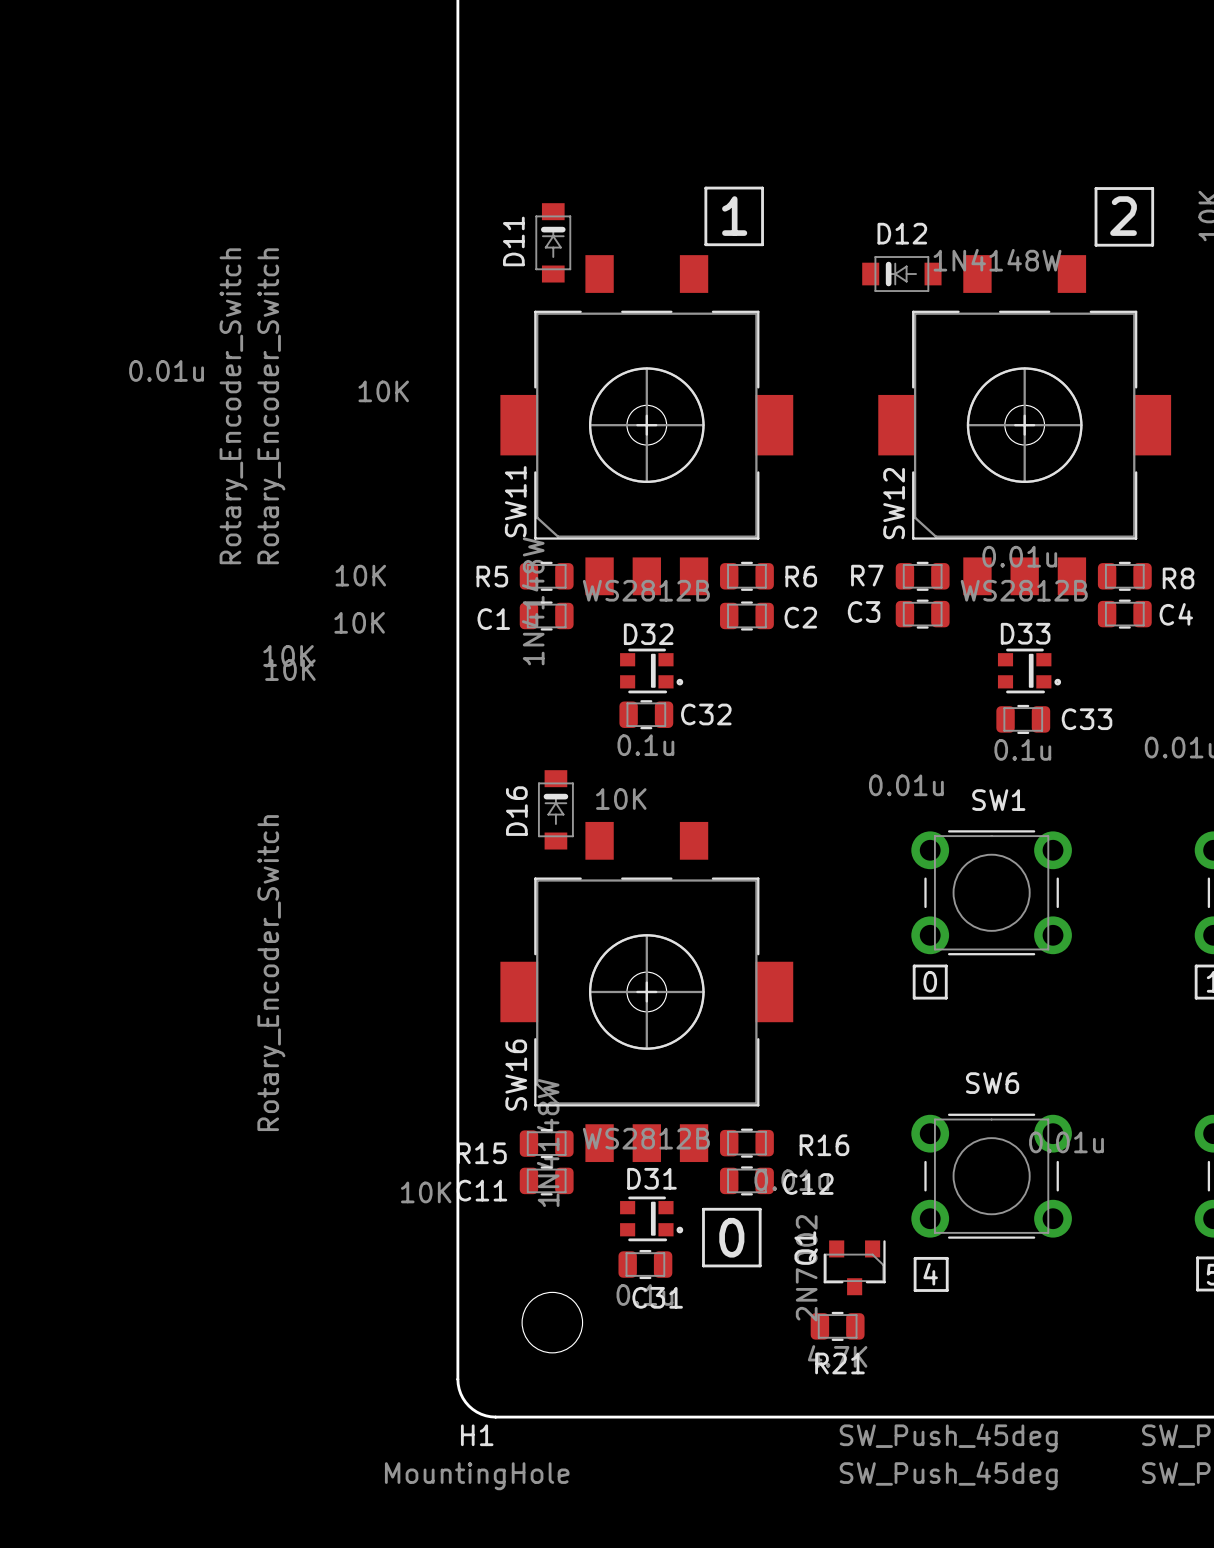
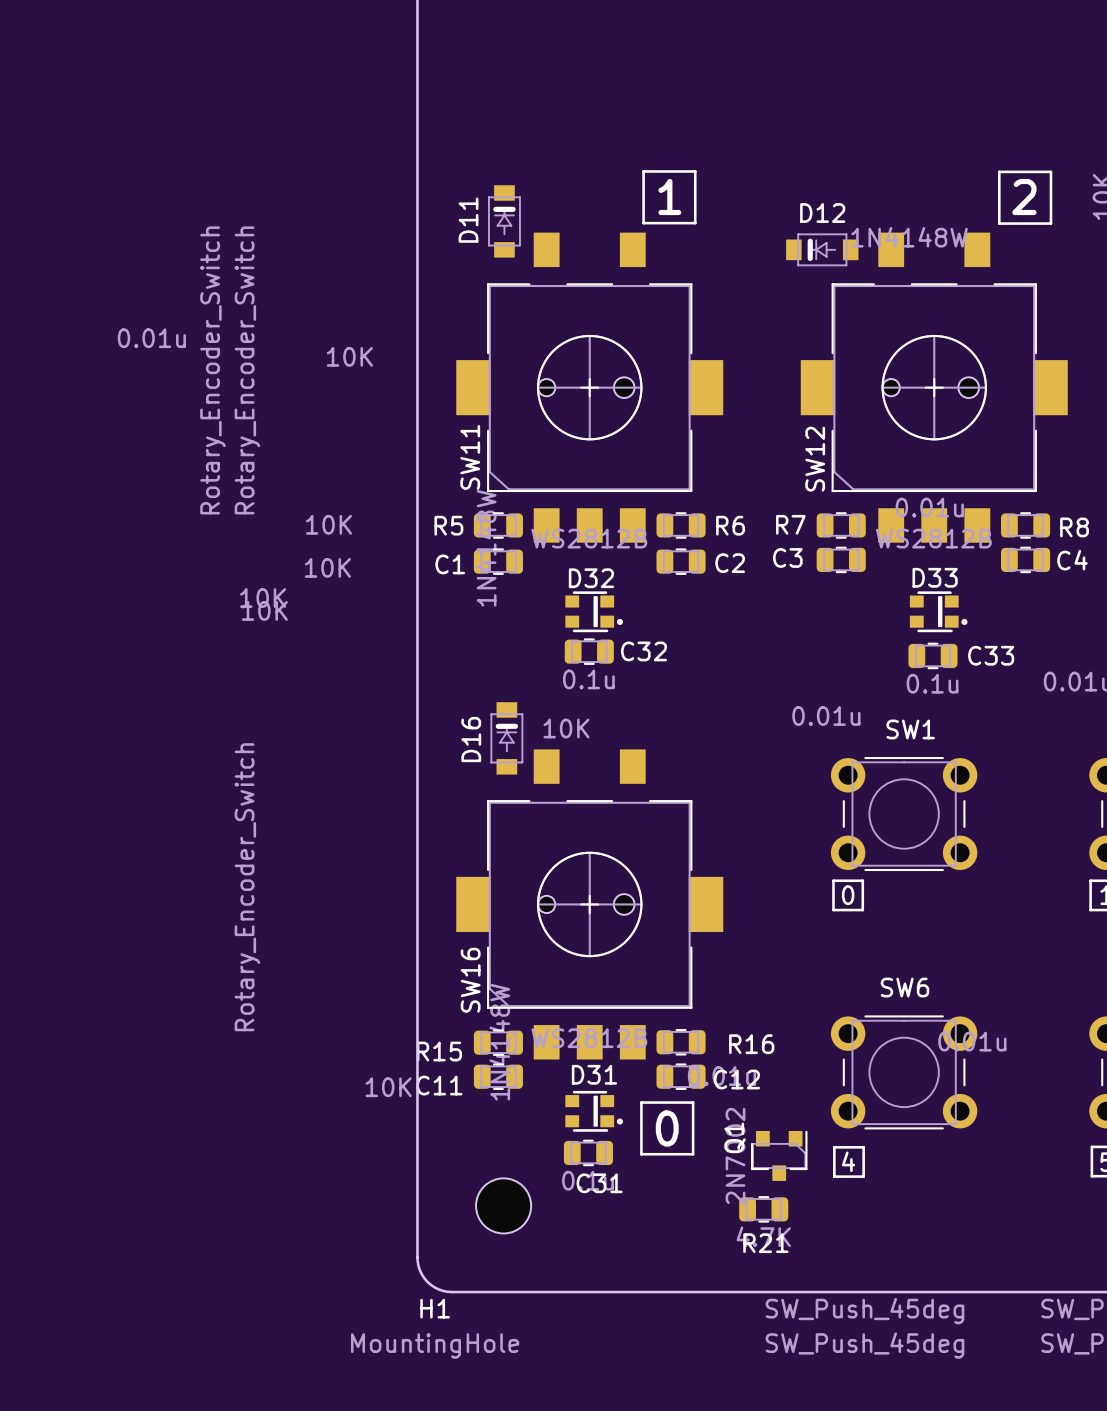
SW11 footprint: [500, 255, 794, 596] -> [456, 232, 724, 543]
SW12 footprint: [878, 255, 1172, 596] -> [800, 232, 1068, 543]
SW16 footprint: [500, 821, 794, 1163] -> [456, 749, 724, 1060]

